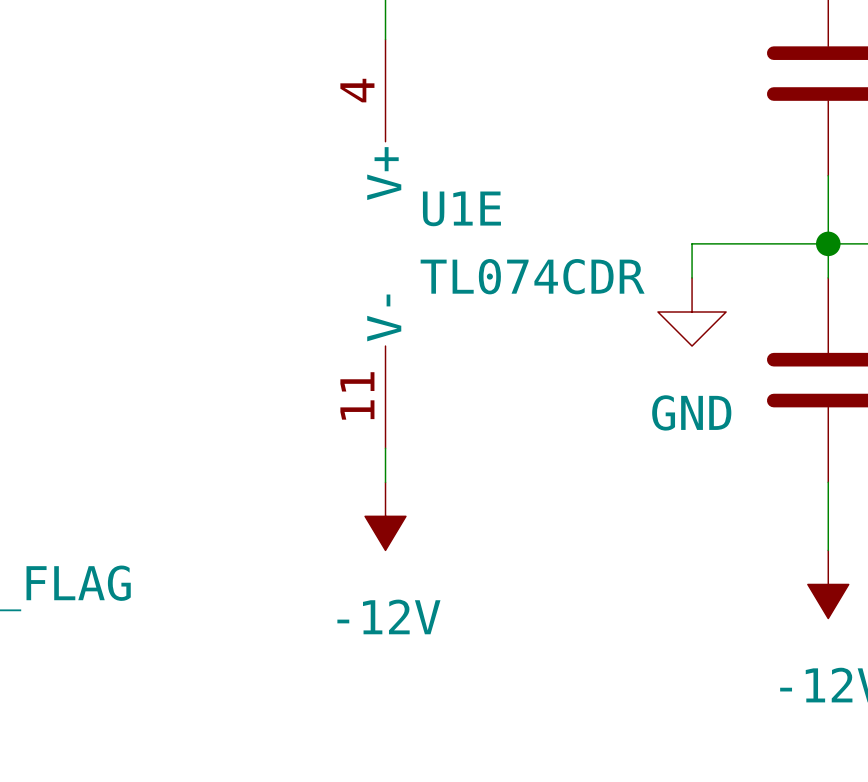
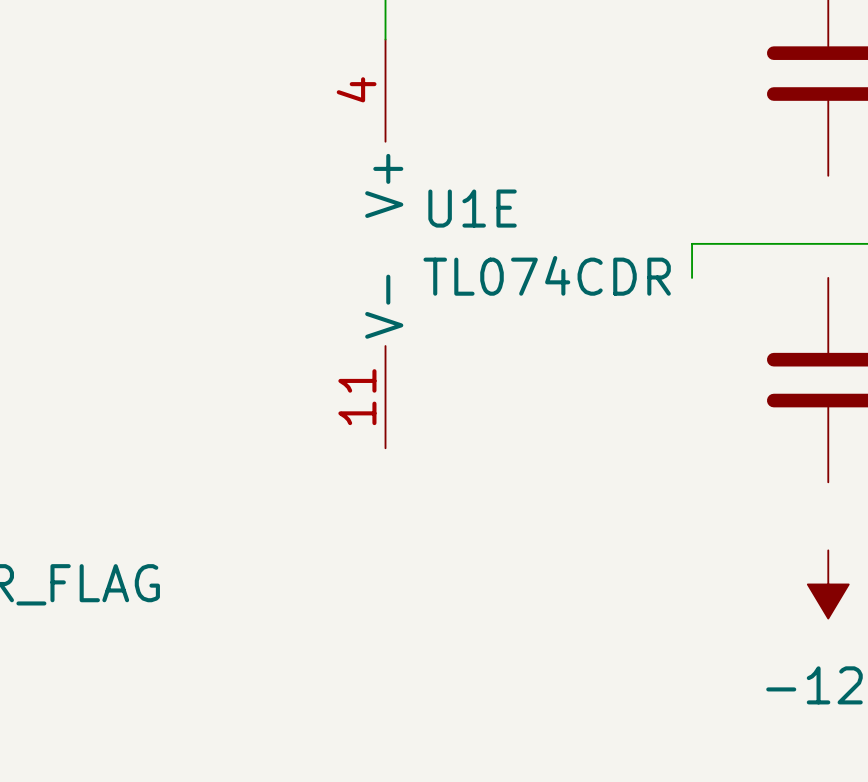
wire: (828, 175) (828, 277) -> none
junction: (828, 243) -> none
power symbol: GND (692, 312) -> none
wire: (385, 448) (385, 482) -> none
wire: (828, 482) (828, 550) -> none
power symbol: -12V (385, 516) -> none

